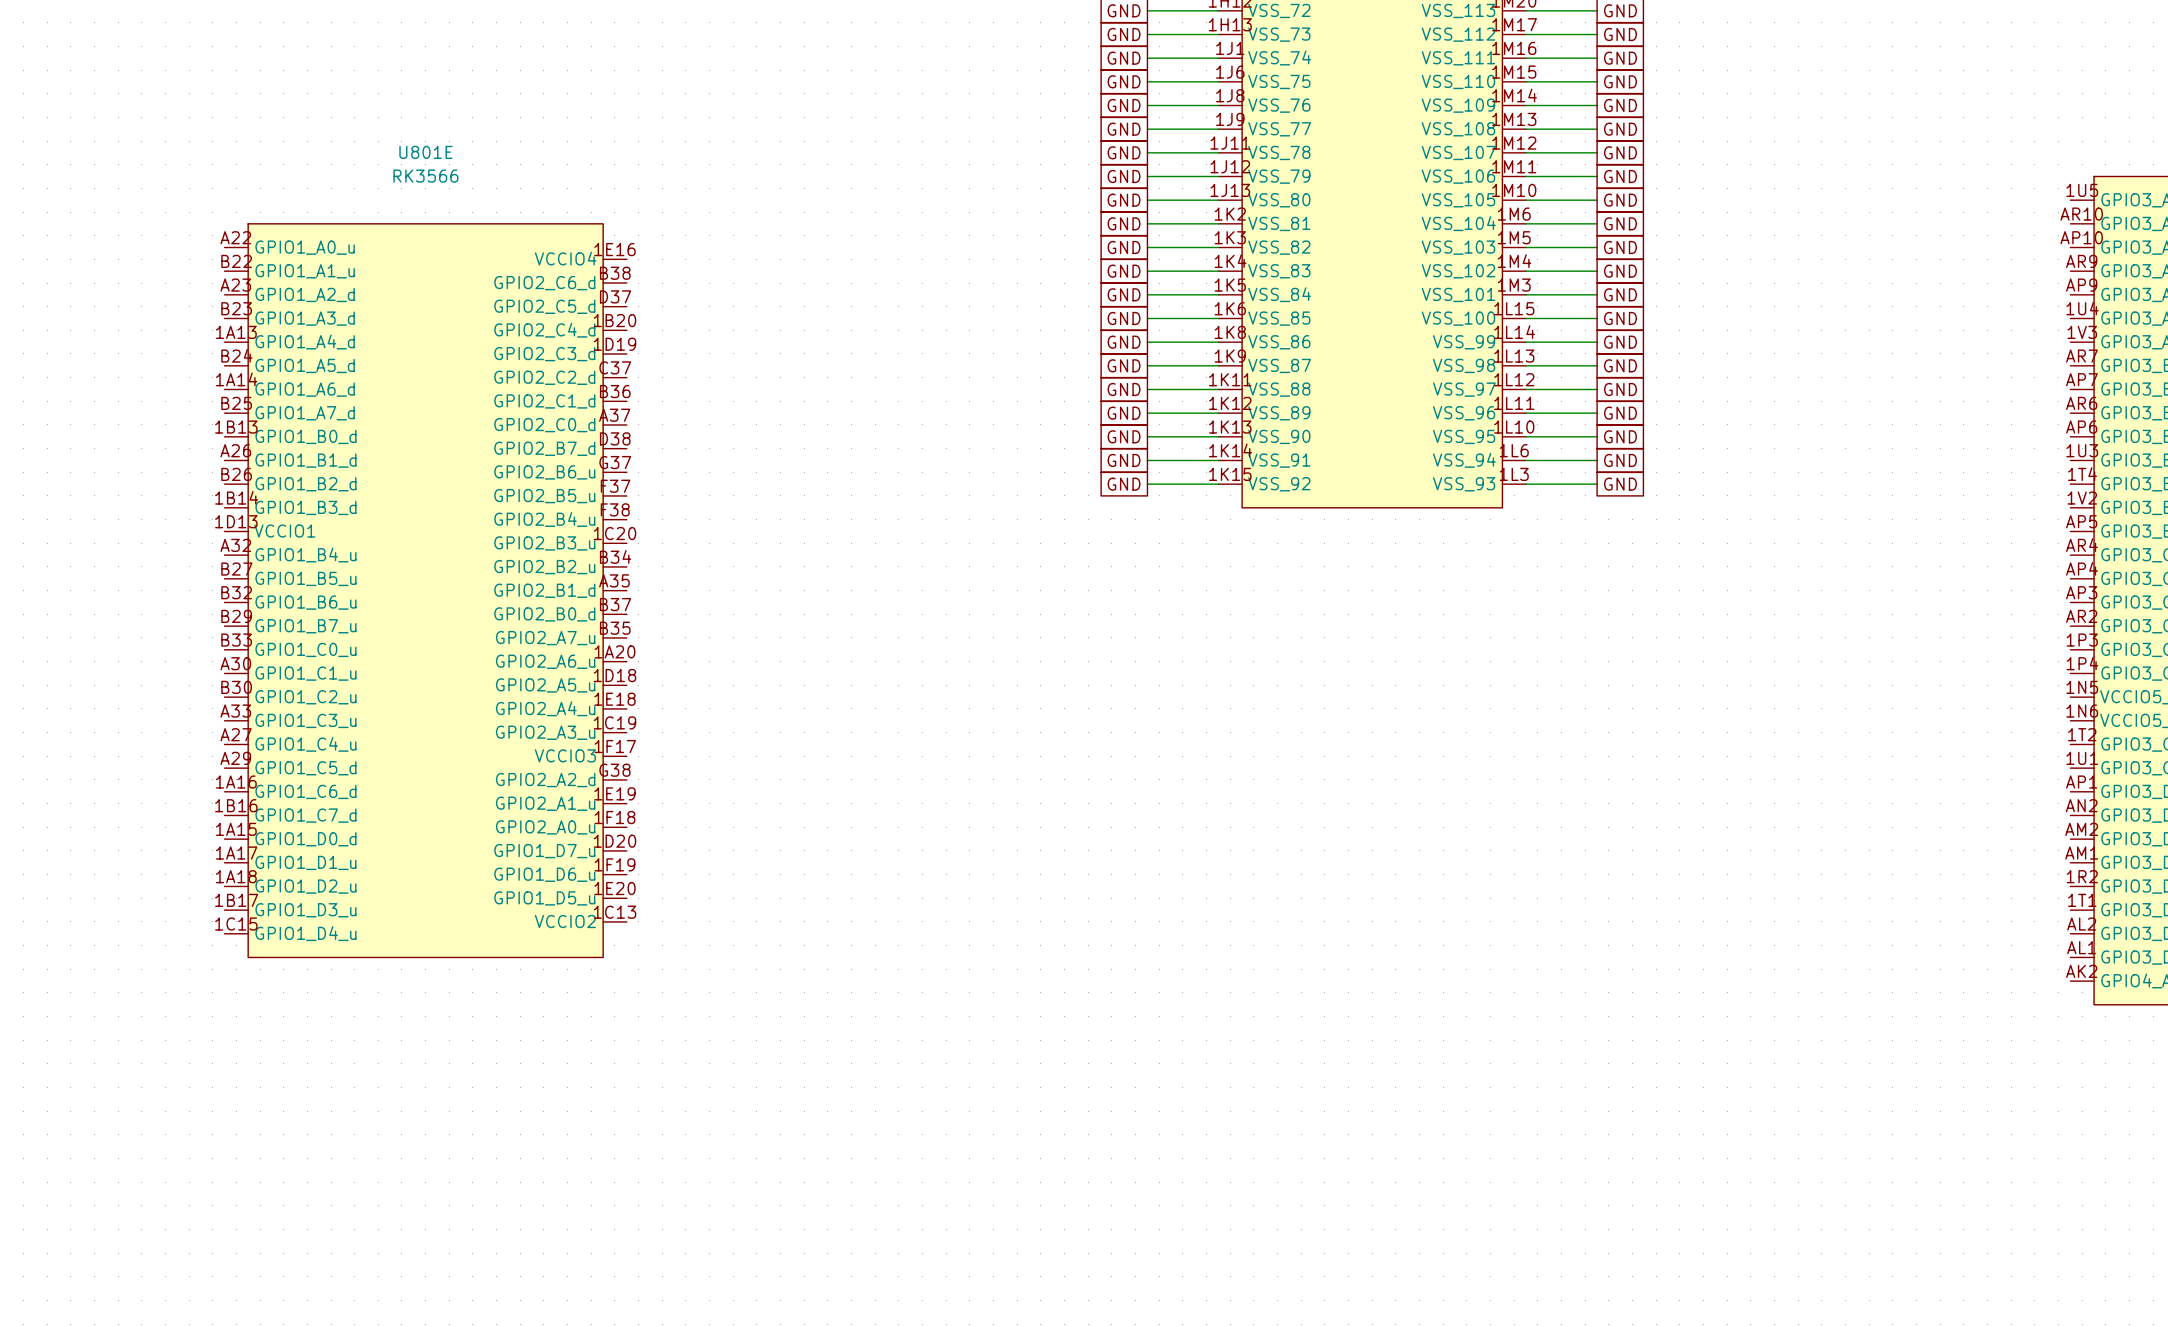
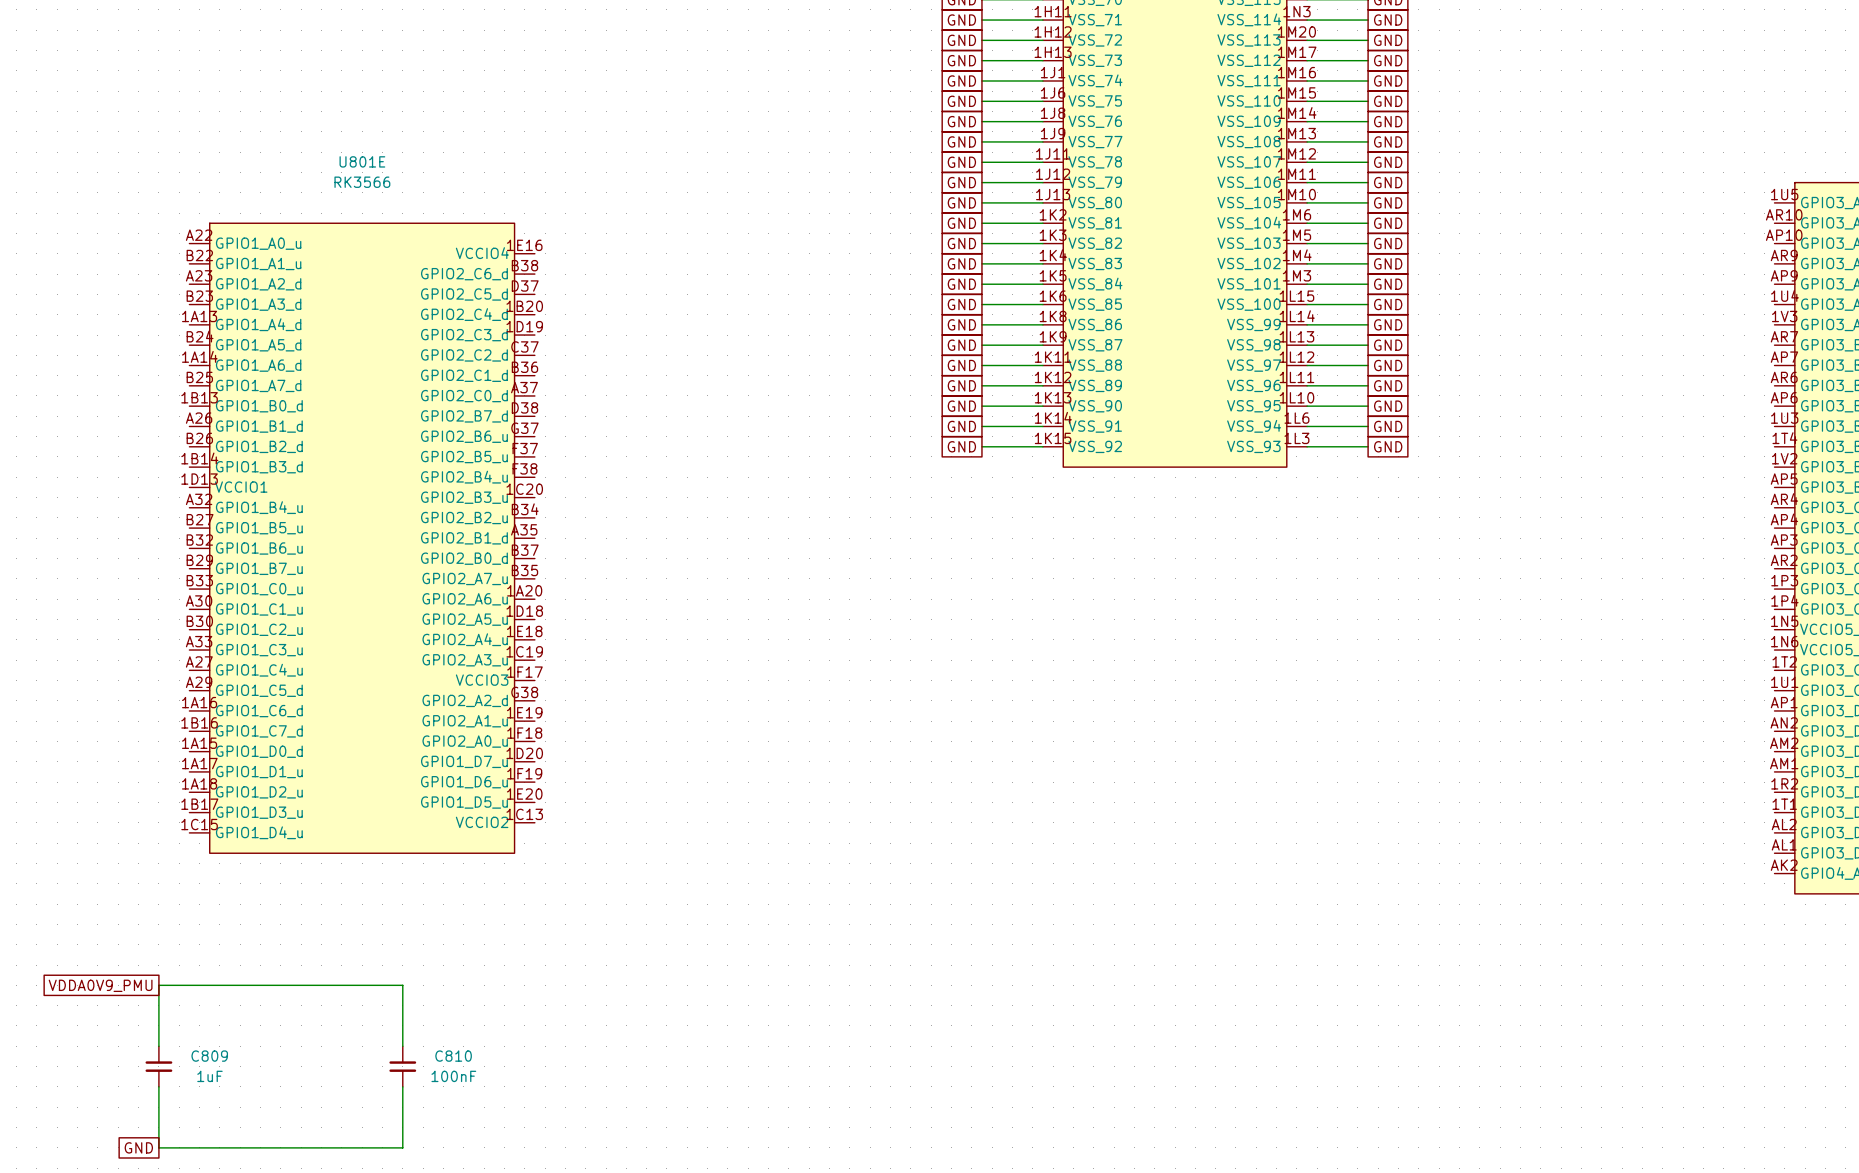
global label: none -> VDDA0V9_PMU (100, 985)
wire: none -> (158, 1046) (158, 985) (402, 985) (402, 1046)
C809: none -> 1uF (158, 1066)
C810: none -> 100nF (402, 1066)
wire: none -> (158, 1086) (158, 1147) (402, 1147) (402, 1086)
global label: none -> GND (138, 1147)

